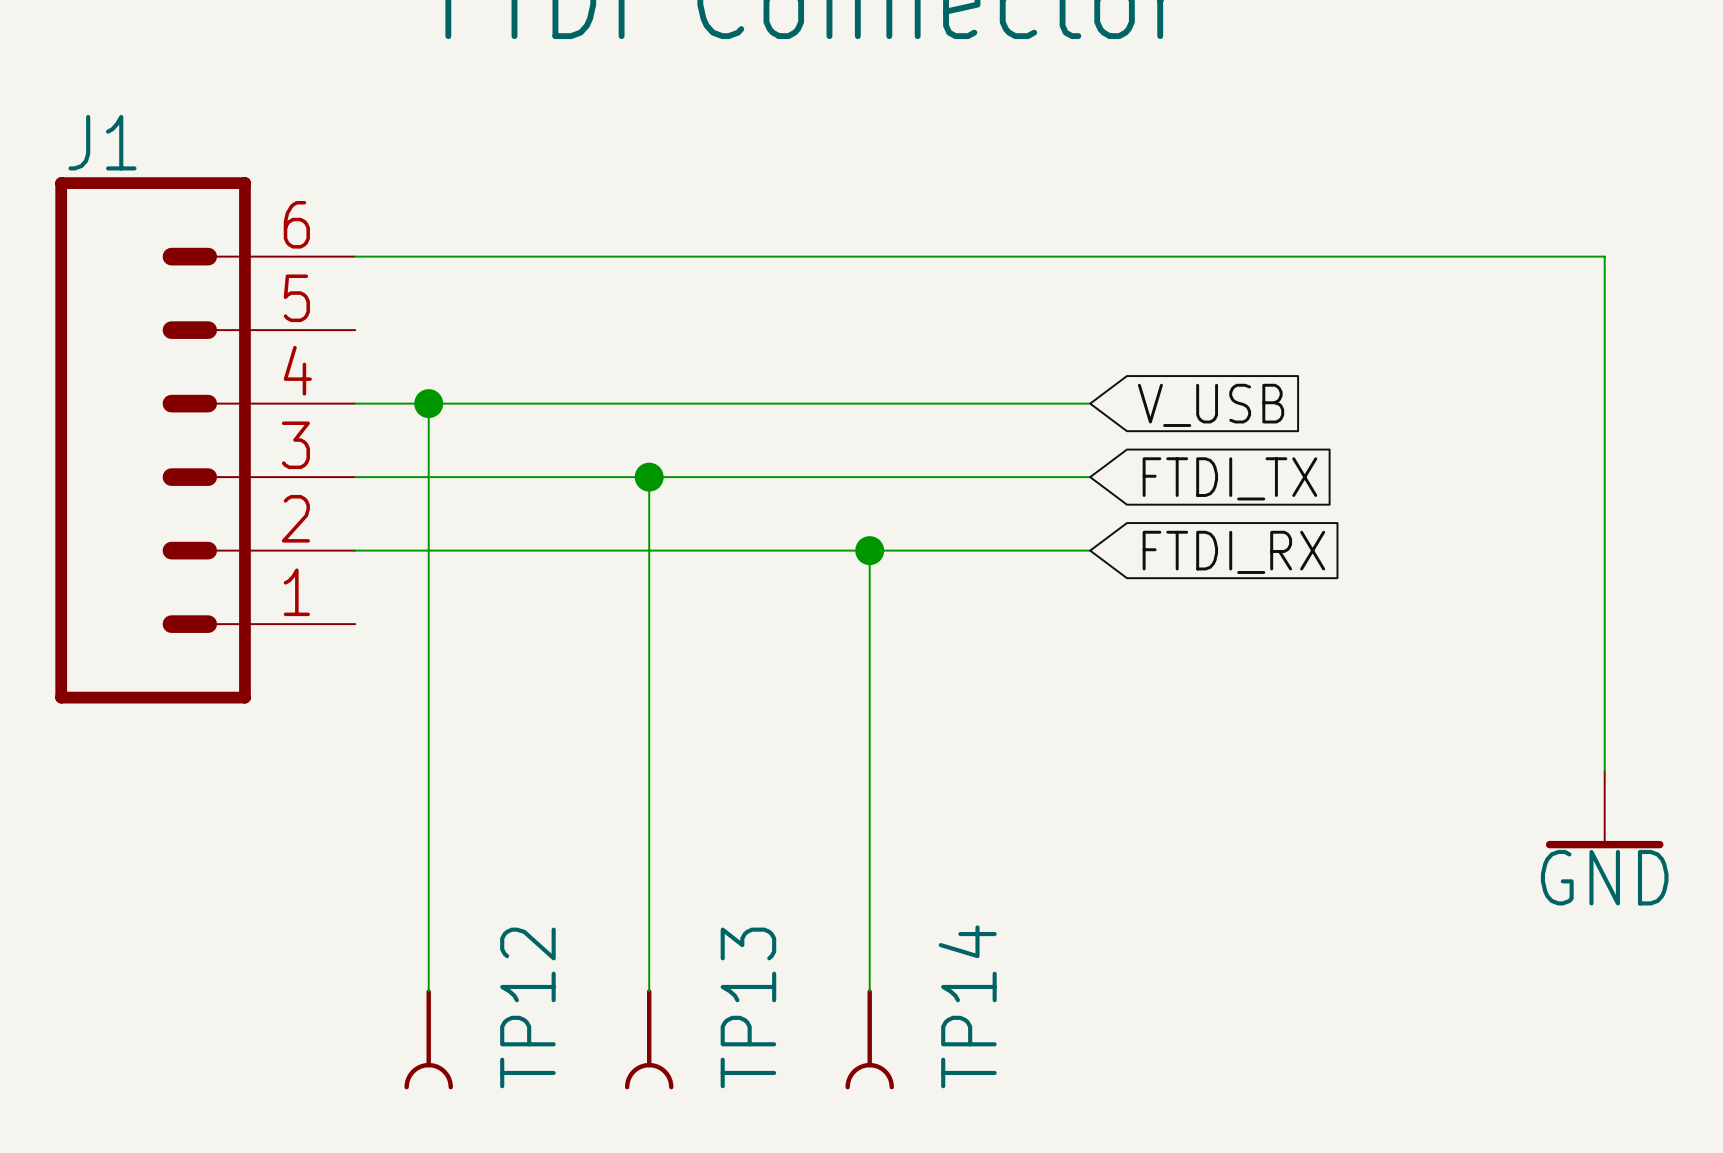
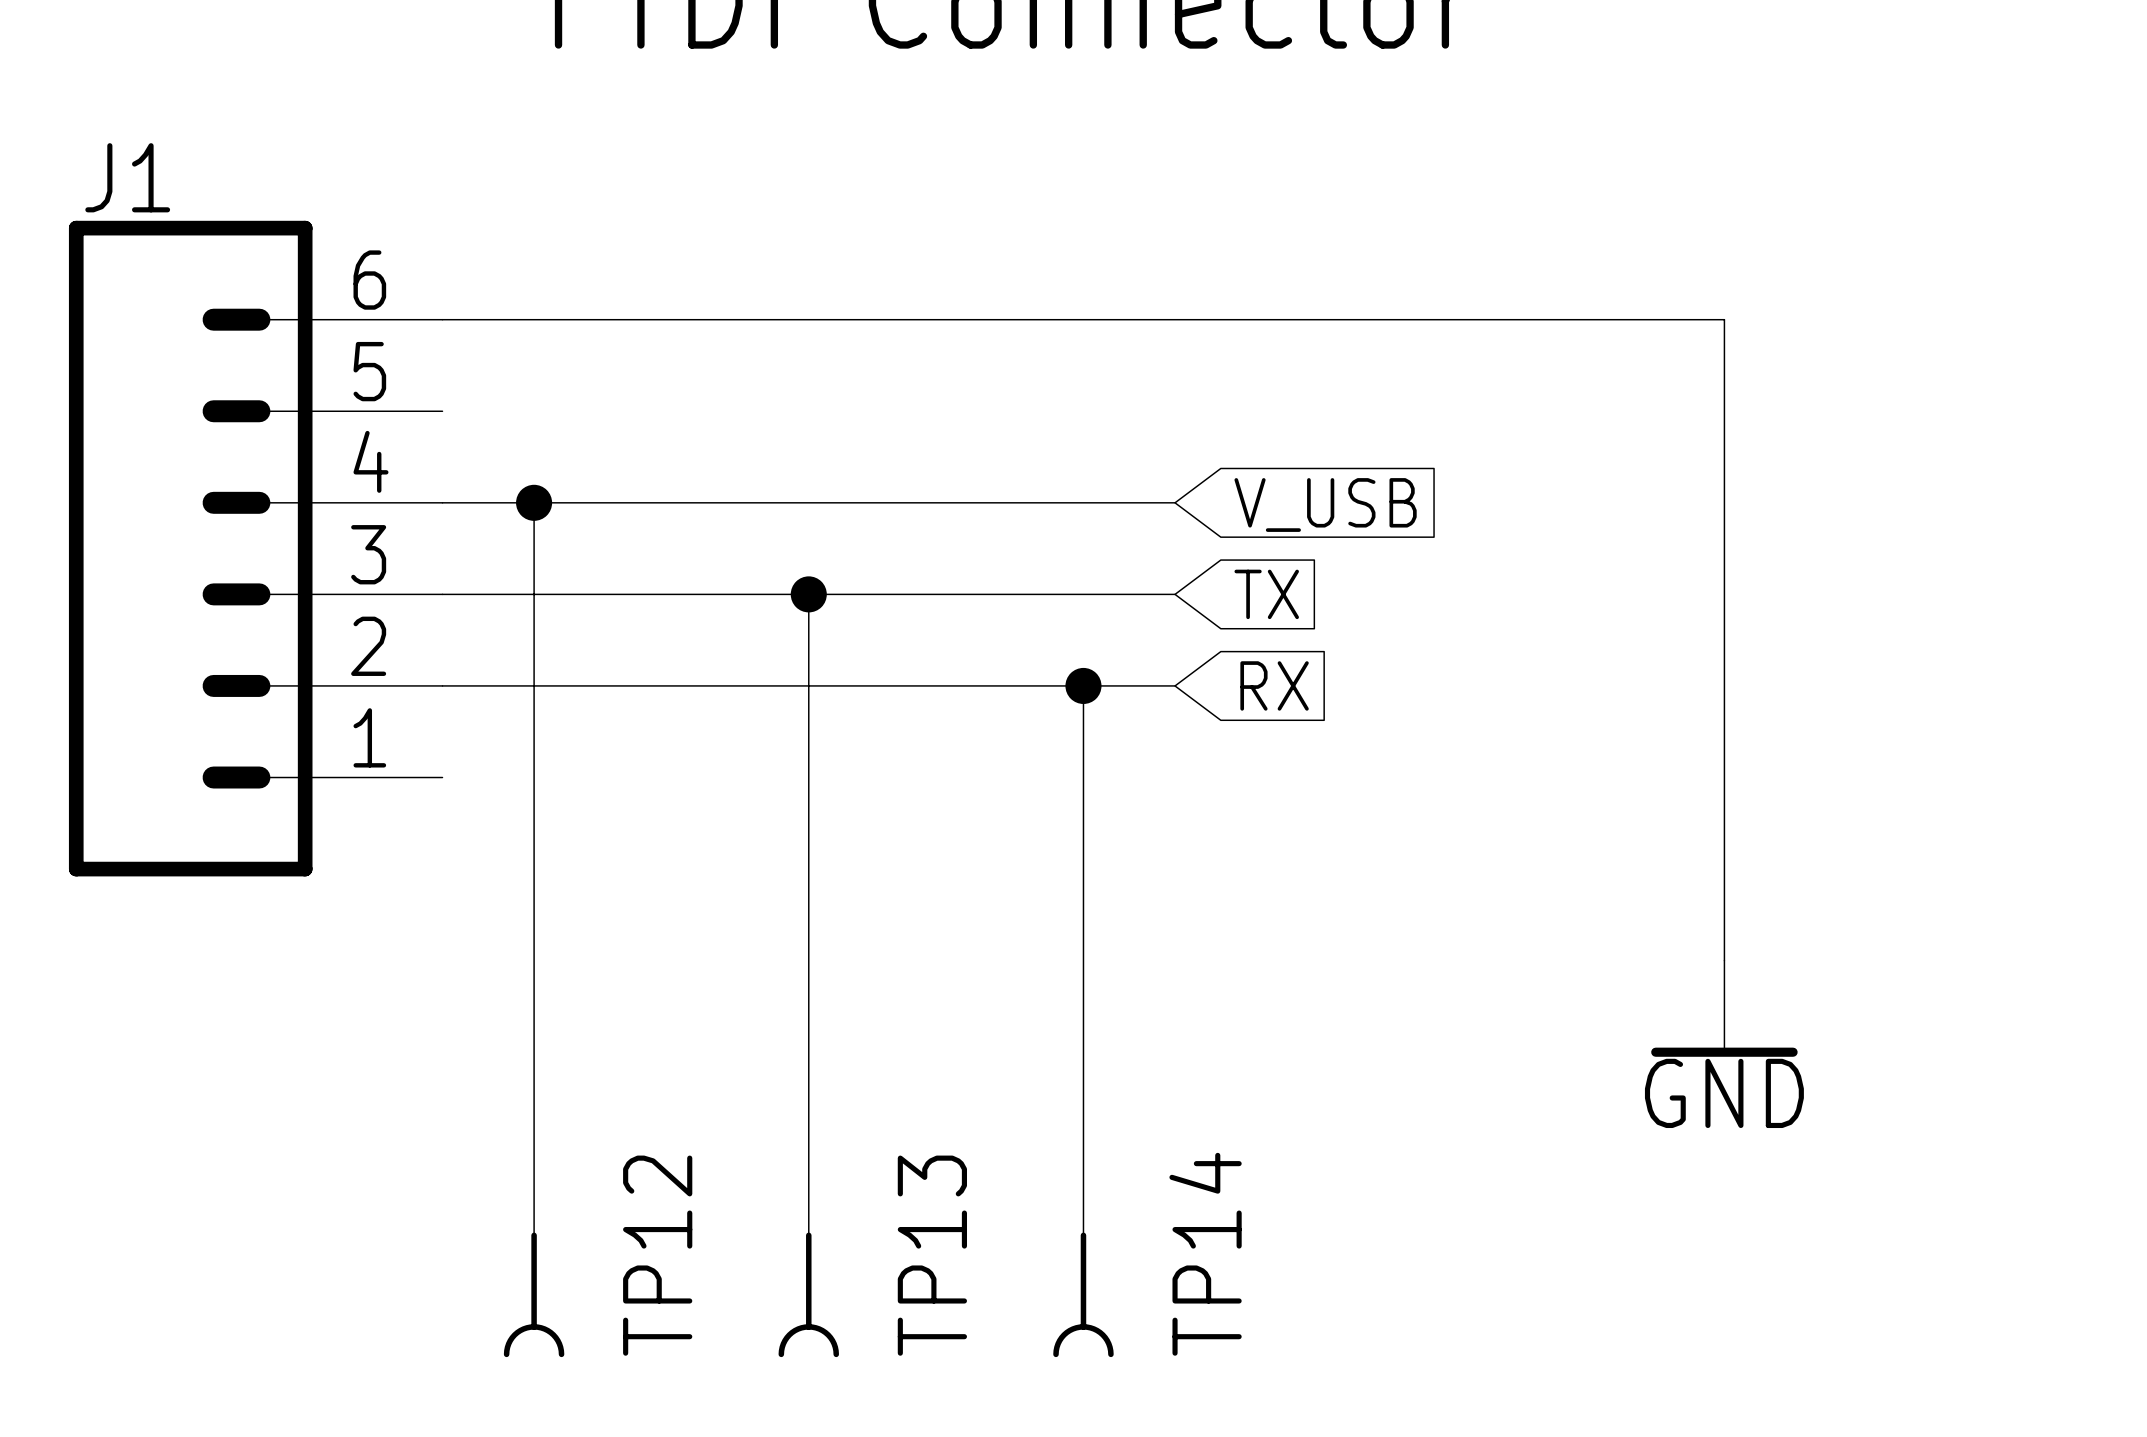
wire: (1384, 256) (1604, 256) (1604, 771) -> (1724, 319) (1724, 960)
wire: (943, 403) (1090, 403) -> none
global label position: V_USB (1211, 405) -> V_USB (1325, 505)
wire: (943, 477) (1090, 477) -> none
global label: none -> TX (1266, 594)
global label: FTDI_TX (1229, 478) -> none
wire: (943, 550) (1090, 550) -> none
global label: none -> RX (1274, 685)
global label: FTDI_RX (1233, 552) -> none
power symbol position: GND (1604, 809) -> GND (1724, 1008)

